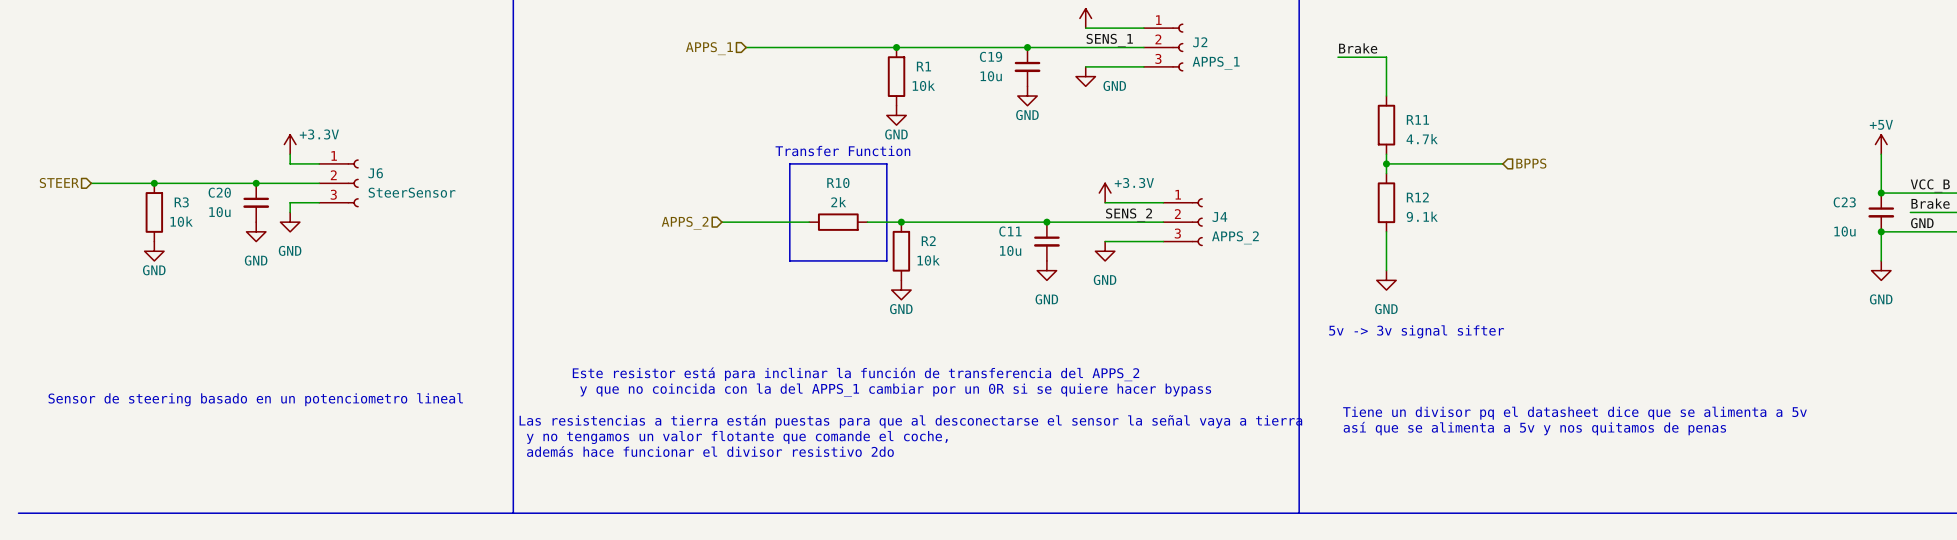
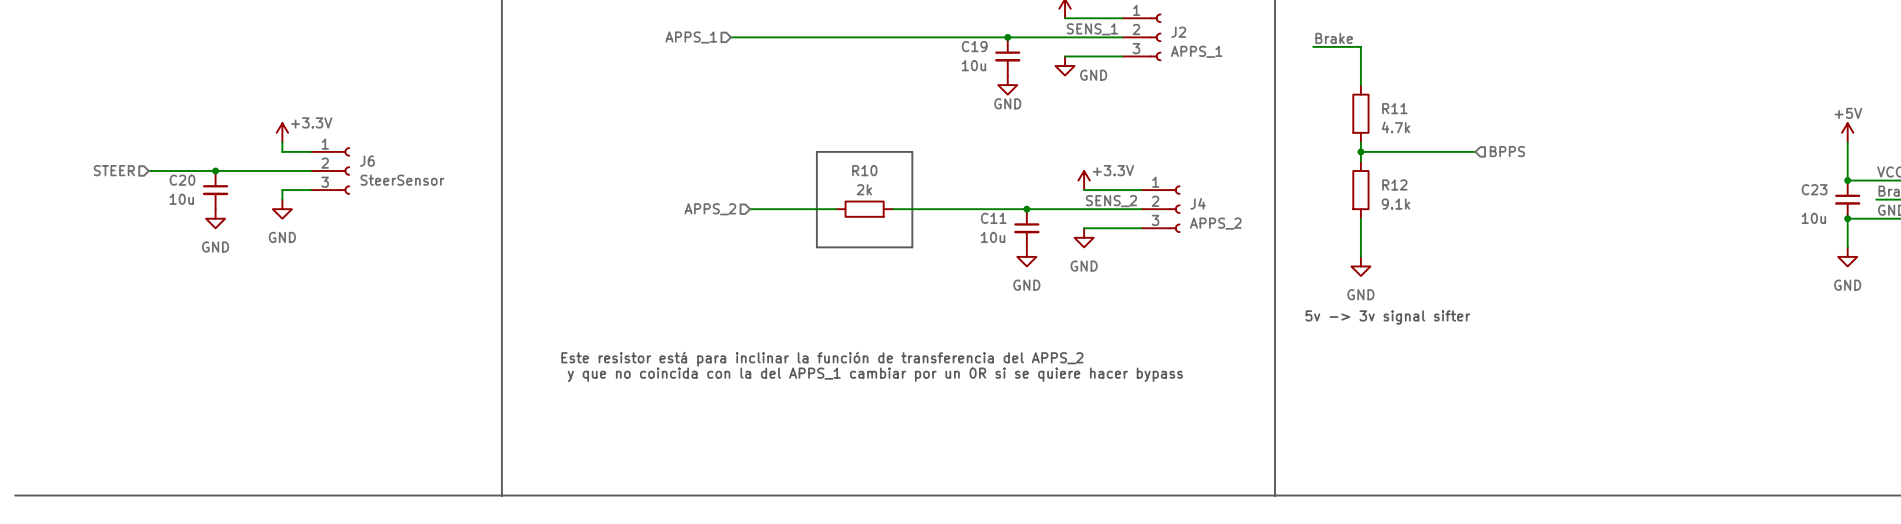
junction: (896, 47) -> none
R1: 10k (896, 76) -> none
power symbol: GND (896, 115) -> none
text: Transfer Function (842, 151) -> none
line: (833, 163) (789, 163) (789, 260) (833, 260) -> (816, 151) (816, 247)
line: (886, 163) (886, 260) -> (869, 151) (912, 151) (912, 247) (869, 247)
hierarchical label position: STEER (59, 182) -> STEER (114, 170)
wire: (91, 183) (154, 183) -> none
junction: (154, 183) -> none
junction: none -> (215, 171)
junction: (256, 183) -> none
C20 position: (256, 202) -> (215, 190)
R3: 10k (154, 212) -> none
wire: (721, 222) (765, 222) -> none
R10 position: (838, 222) -> (864, 209)
wire: (867, 222) (911, 222) -> (793, 209) (835, 209)
junction: (901, 222) -> none
hierarchical label position: APPS_2 (685, 223) -> APPS_2 (710, 209)
power symbol position: GND (256, 231) -> GND (215, 218)
power symbol: GND (154, 251) -> none
R2: 10k (901, 251) -> none
power symbol: GND (901, 290) -> none
text: Sensor de steering basado en un potenciometro lineal (255, 399) -> none
text: Tiene un divisor pq el datasheet dice que se alimenta a 5v (1574, 413) -> none
text: Las resistencias a tierra están puestas para que al desconectarse el sensor la señal vaya a tierra (910, 421) -> none
text: así que se alimenta a 5v y nos quitamos de penas (1534, 428) -> none
text: y no tengamos un valor flotante que comande el coche, (737, 437) -> none
text: además hace funcionar el divisor resistivo 2do (710, 451) -> none

